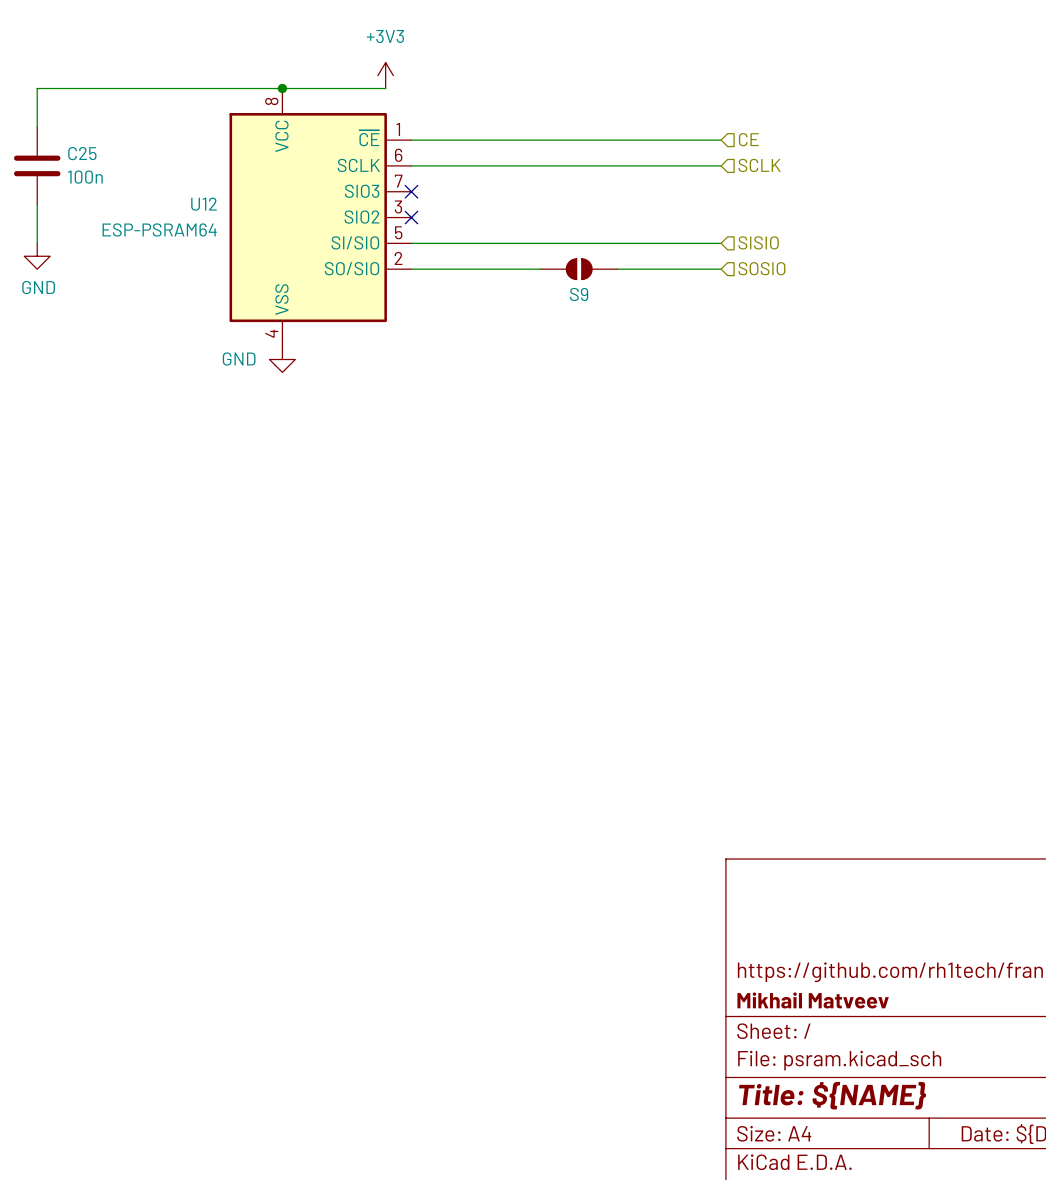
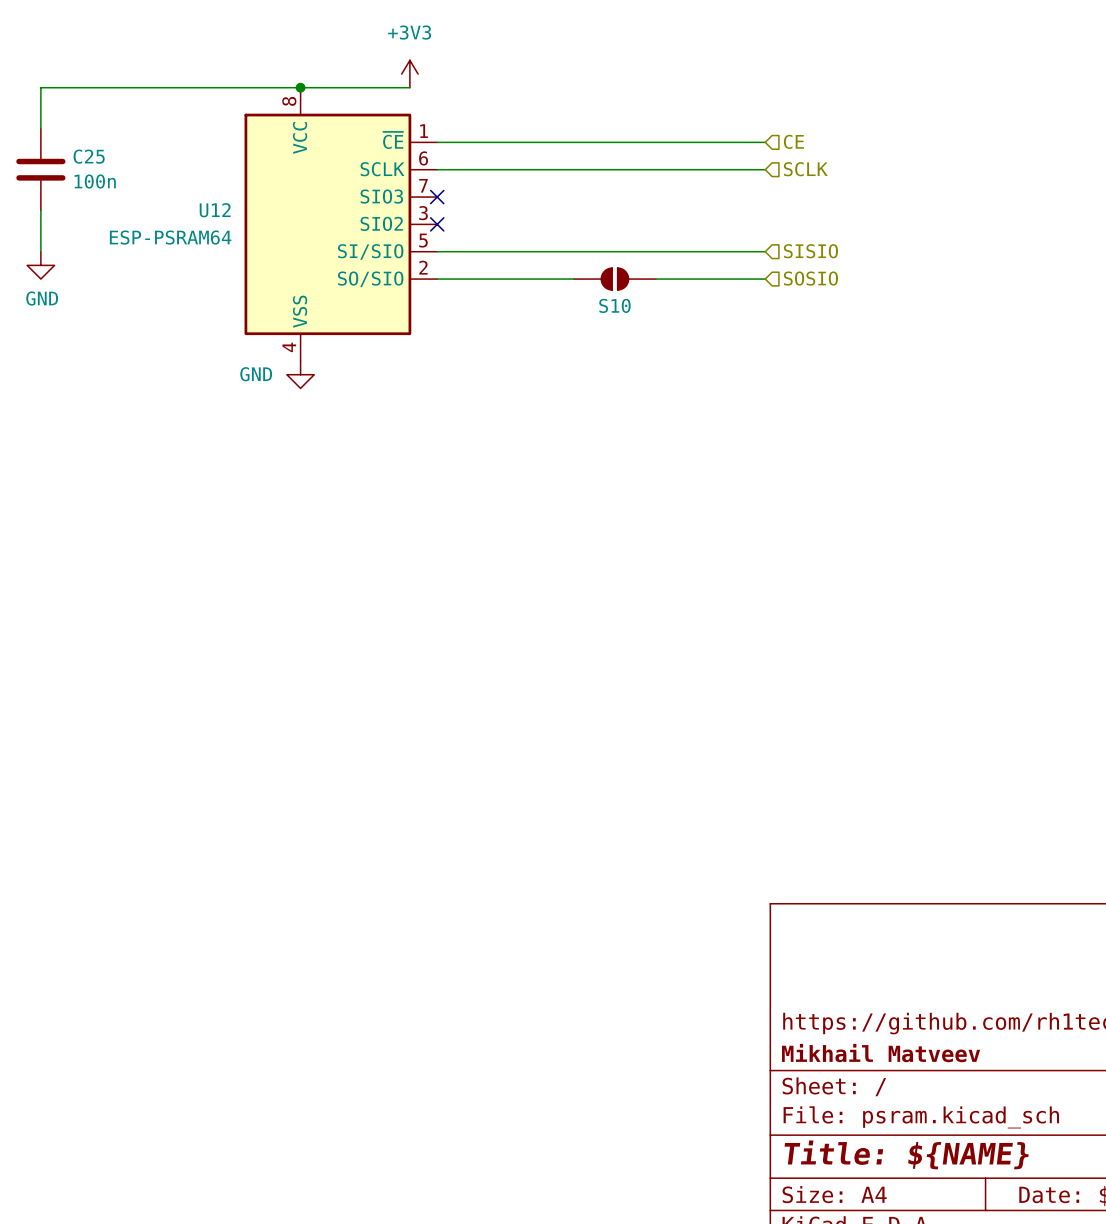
S9 name: S9 (579, 294) -> S10 (614, 305)

